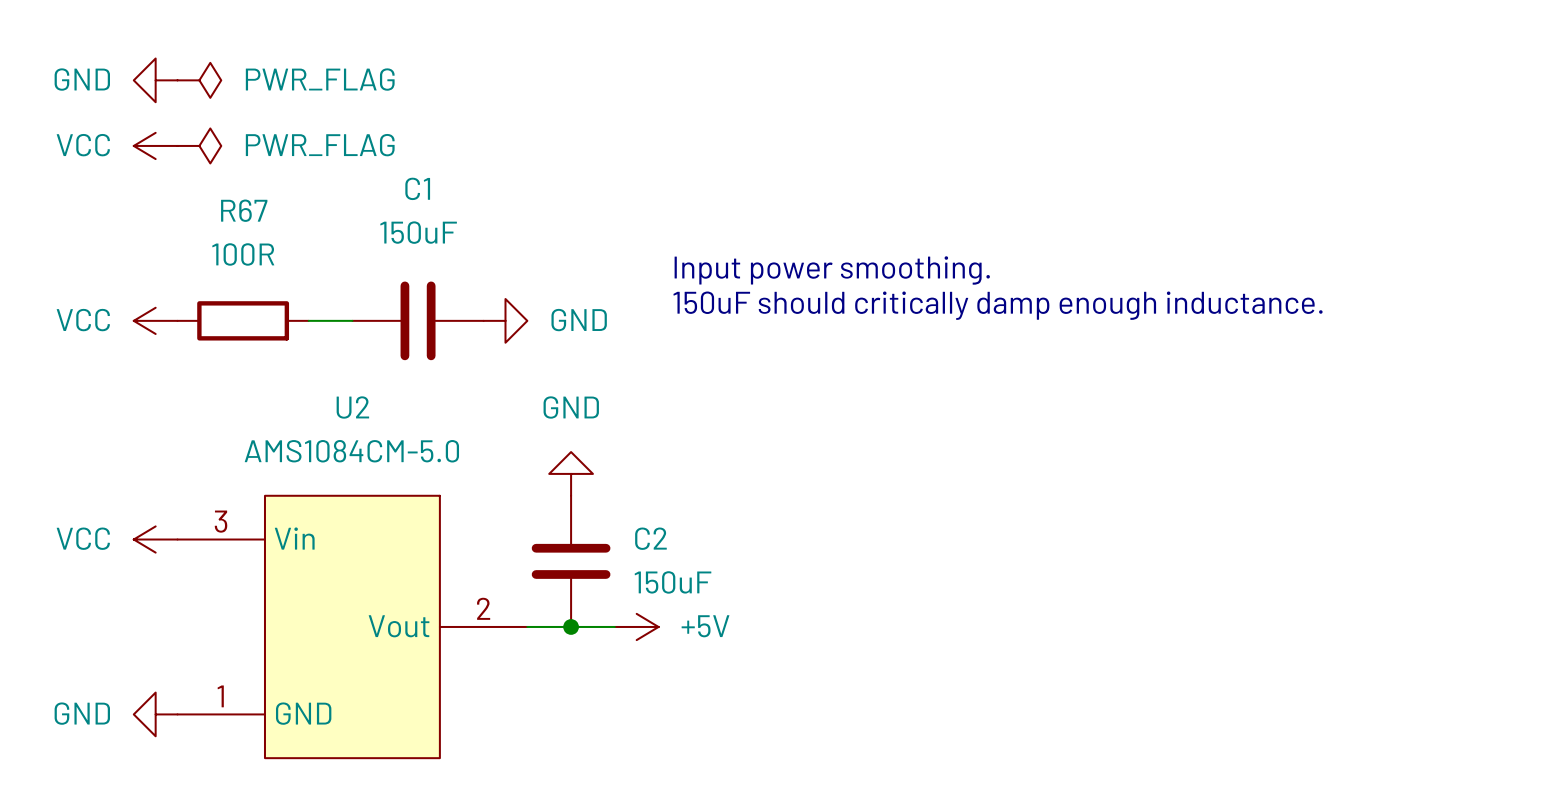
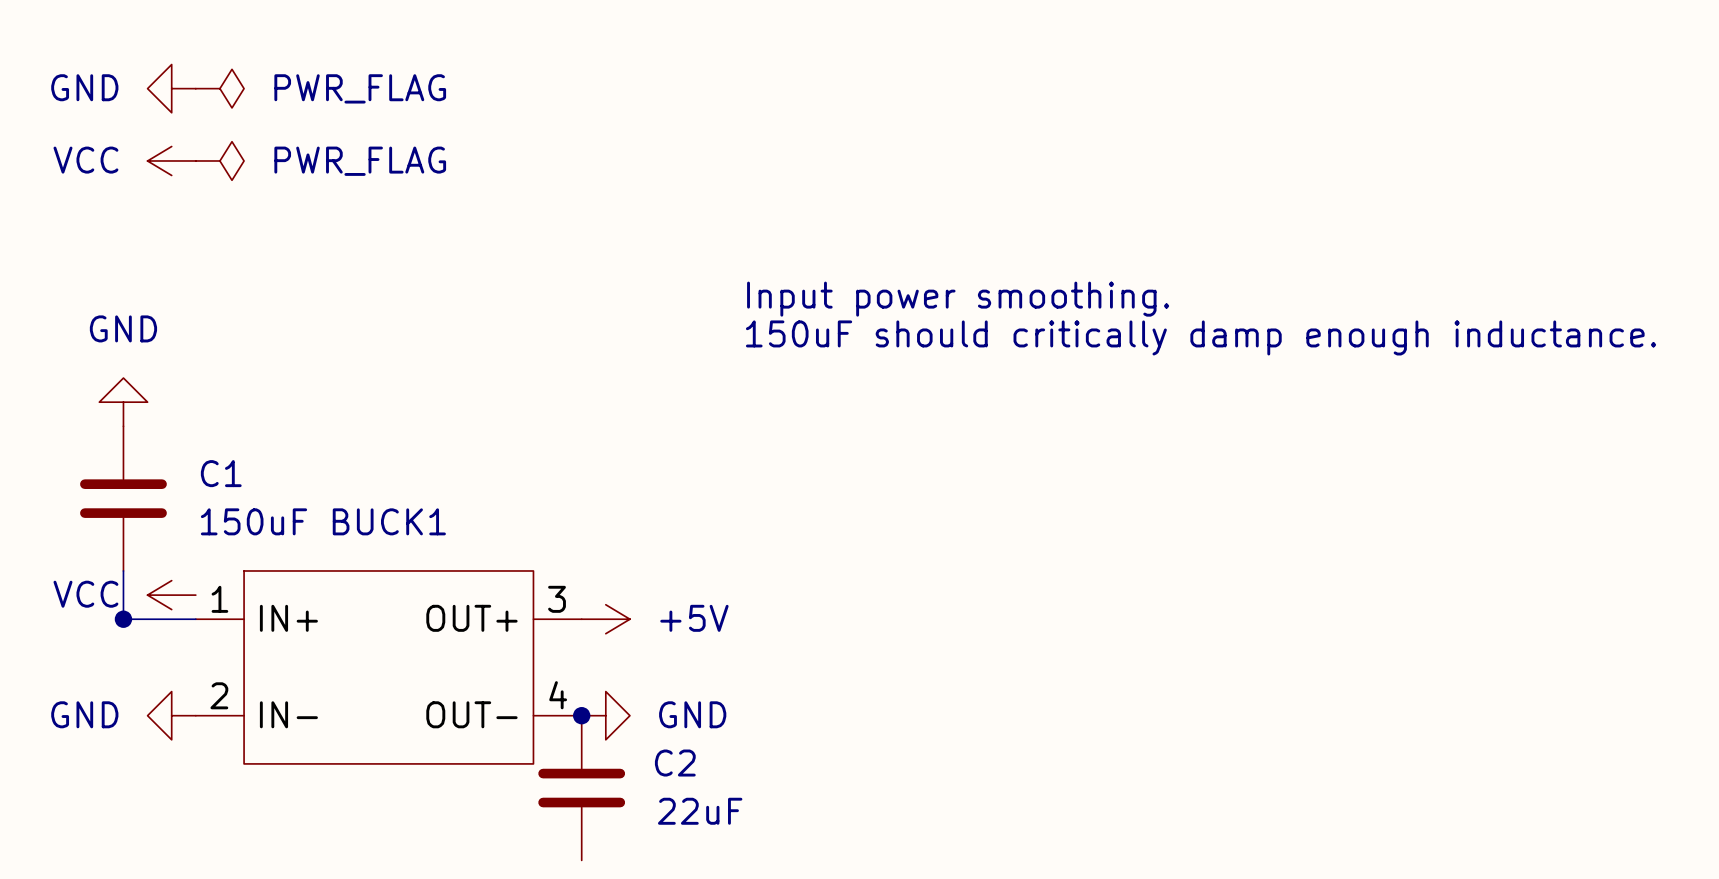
C1 name position: C1 (417, 188) -> C1 (221, 473)
C1 value position: 150uF (418, 232) -> 150uF (253, 521)
power symbol: VCC (155, 320) -> none
R67: 100R (243, 320) -> none
wire: (308, 320) (352, 320) -> none
C1 rotation: 0° (418, 320) -> 90° clockwise (123, 498)
C1 position: (418, 320) -> (123, 498)
power symbol: GND (505, 320) -> none
power symbol: none -> GND (123, 402)
power symbol: GND (571, 473) -> none
wire: none -> (123, 570) (123, 619) (195, 619)
junction: none -> (123, 619)
C2 position: (571, 561) -> (581, 788)
C2 value: 150uF (673, 582) -> 22uF (700, 811)
BUCK1: none -> (388, 667)
U2: AMS1084CM-5.0 (352, 626) -> none
wire: (527, 626) (614, 626) -> none
junction position: (571, 626) -> (581, 715)
power symbol position: +5V (636, 626) -> +5V (605, 619)
power symbol: none -> GND (605, 715)
power symbol position: GND (155, 714) -> GND (171, 715)

